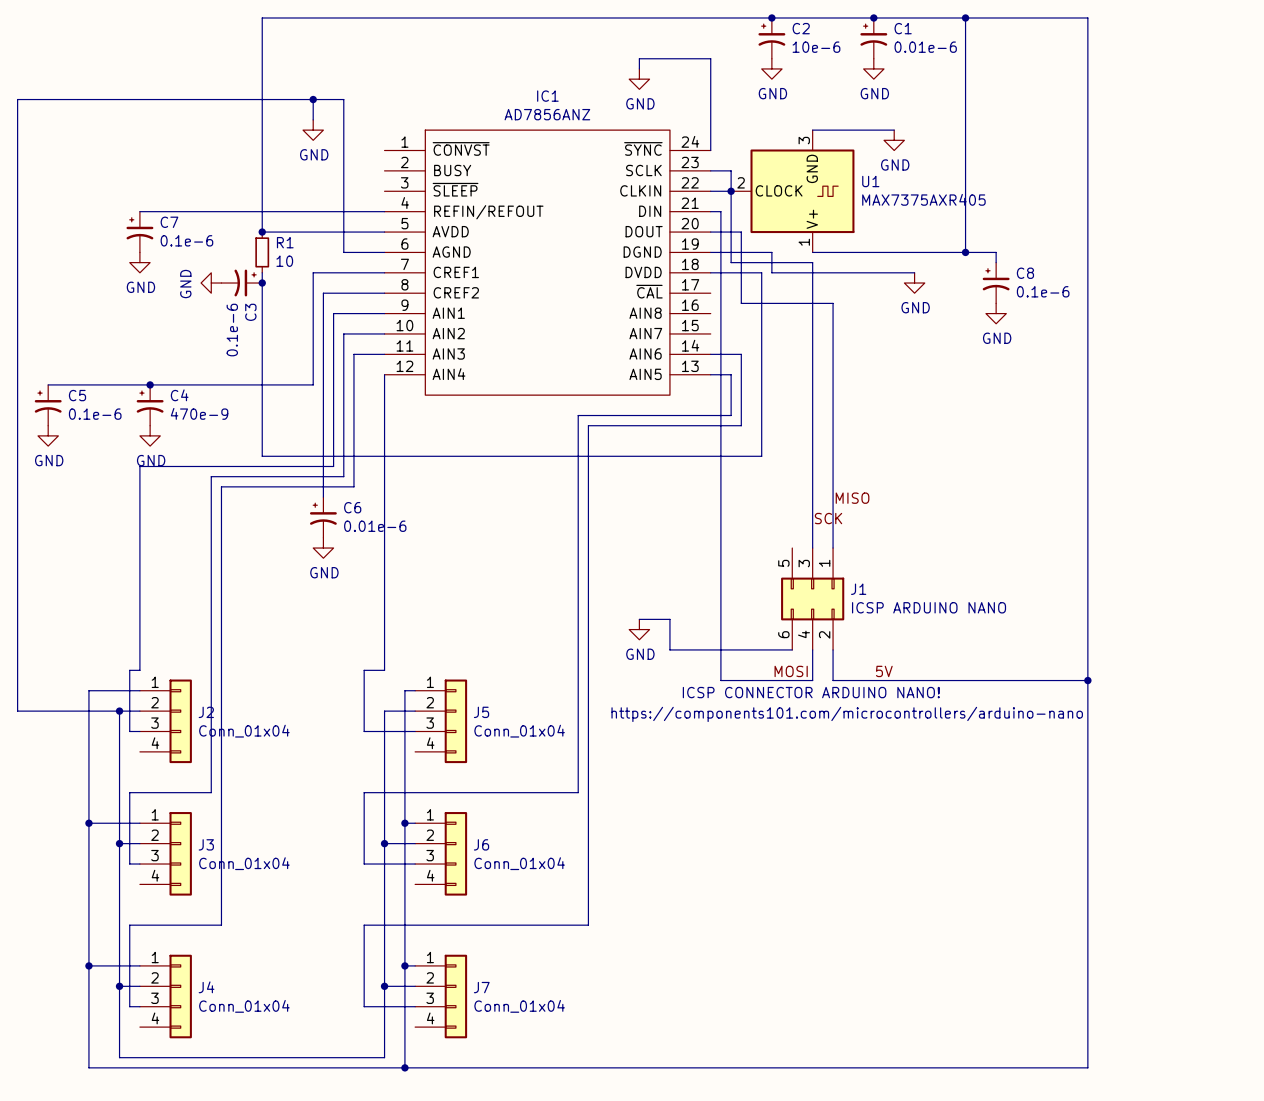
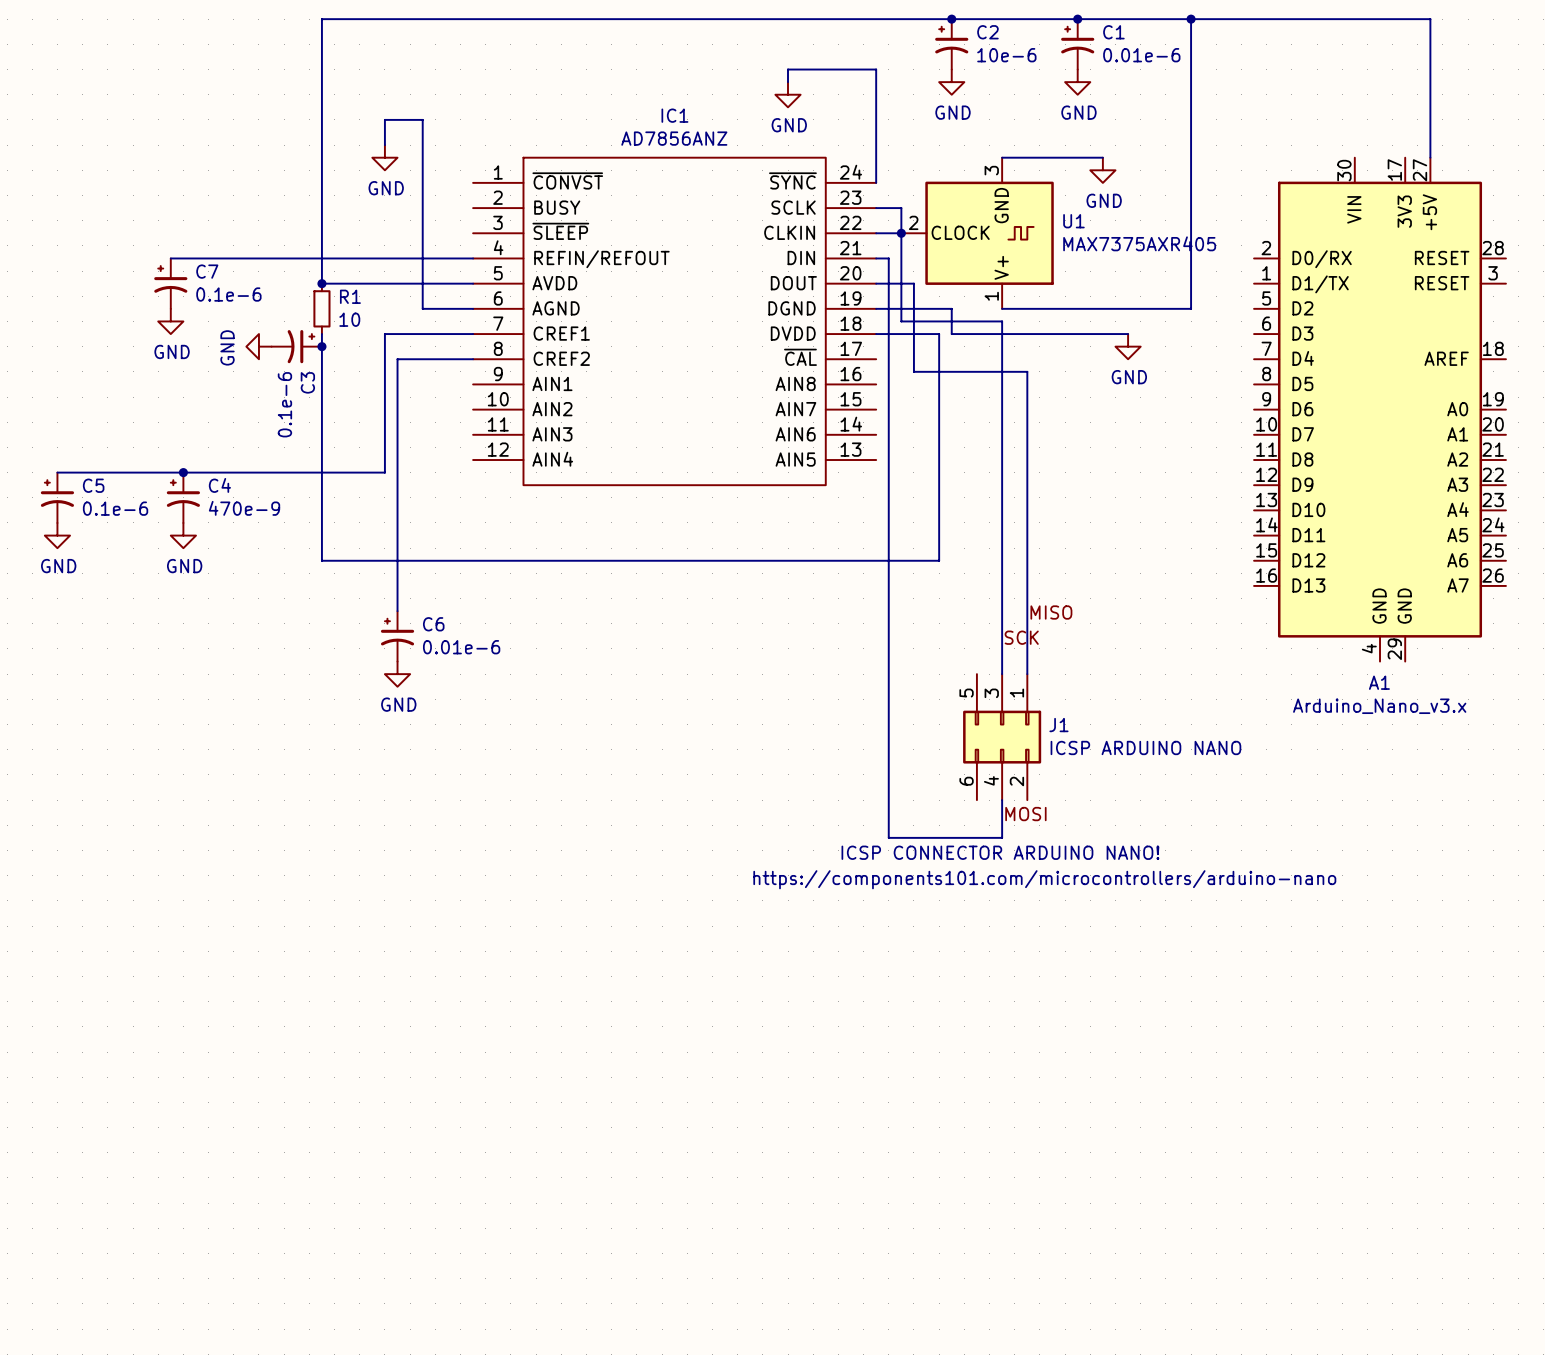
wire: (1087, 17) (1087, 1067) (88, 1067) (88, 690) (139, 690) -> (1342, 19) (1430, 19) (1430, 157)
wire: (313, 99) (17, 99) (17, 711) (139, 711) -> none
junction: (313, 99) -> none
wire: (965, 252) (996, 252) (996, 262) -> none
junction: (965, 252) -> none
C8: 0.1e-6 (996, 283) -> none
wire: (384, 313) (333, 313) (333, 466) (139, 466) (139, 670) (129, 670) (129, 731) (139, 731) -> none
power symbol: GND (996, 313) -> none
wire: (384, 333) (343, 333) (343, 476) (211, 476) (211, 792) (129, 792) (129, 864) (139, 864) -> none
A1: none -> Arduino_Nano_v3.x (1380, 409)
wire: (384, 354) (353, 354) (353, 486) (221, 486) (221, 925) (129, 925) (129, 1006) (139, 1006) -> none
wire: (710, 354) (741, 354) (741, 425) (588, 425) (588, 925) (364, 925) (364, 1006) (415, 1006) -> none
wire: (384, 374) (384, 670) (364, 670) (364, 731) (415, 731) -> none
wire: (710, 374) (731, 374) (731, 415) (578, 415) (578, 792) (364, 792) (364, 864) (415, 864) -> none
wire: (639, 619) (669, 619) (669, 649) (792, 649) -> none
power symbol: GND (639, 629) -> none
wire: (833, 649) (833, 680) (1087, 680) -> none
label position: MOSI (791, 671) -> MOSI (1025, 814)
label: 5V (884, 671) -> none
junction: (1087, 680) -> none
wire: (415, 690) (404, 690) (404, 1067) -> none
wire: (119, 711) (119, 1057) (384, 1057) (384, 711) (415, 711) -> none
junction: (119, 711) -> none
J2: Conn_01x04 (165, 721) -> none
J5: Conn_01x04 (441, 721) -> none
wire: (88, 823) (139, 823) -> none
junction: (88, 823) -> none
wire: (404, 823) (415, 823) -> none
junction: (404, 823) -> none
wire: (119, 843) (139, 843) -> none
junction: (119, 843) -> none
wire: (384, 843) (415, 843) -> none
junction: (384, 843) -> none
J3: Conn_01x04 (165, 853) -> none
J6: Conn_01x04 (441, 853) -> none
wire: (88, 965) (139, 965) -> none
junction: (88, 965) -> none
wire: (404, 965) (415, 965) -> none
junction: (404, 965) -> none
wire: (119, 986) (139, 986) -> none
junction: (119, 986) -> none
wire: (384, 986) (415, 986) -> none
junction: (384, 986) -> none
J4: Conn_01x04 (165, 996) -> none
J7: Conn_01x04 (441, 996) -> none
junction: (404, 1067) -> none

